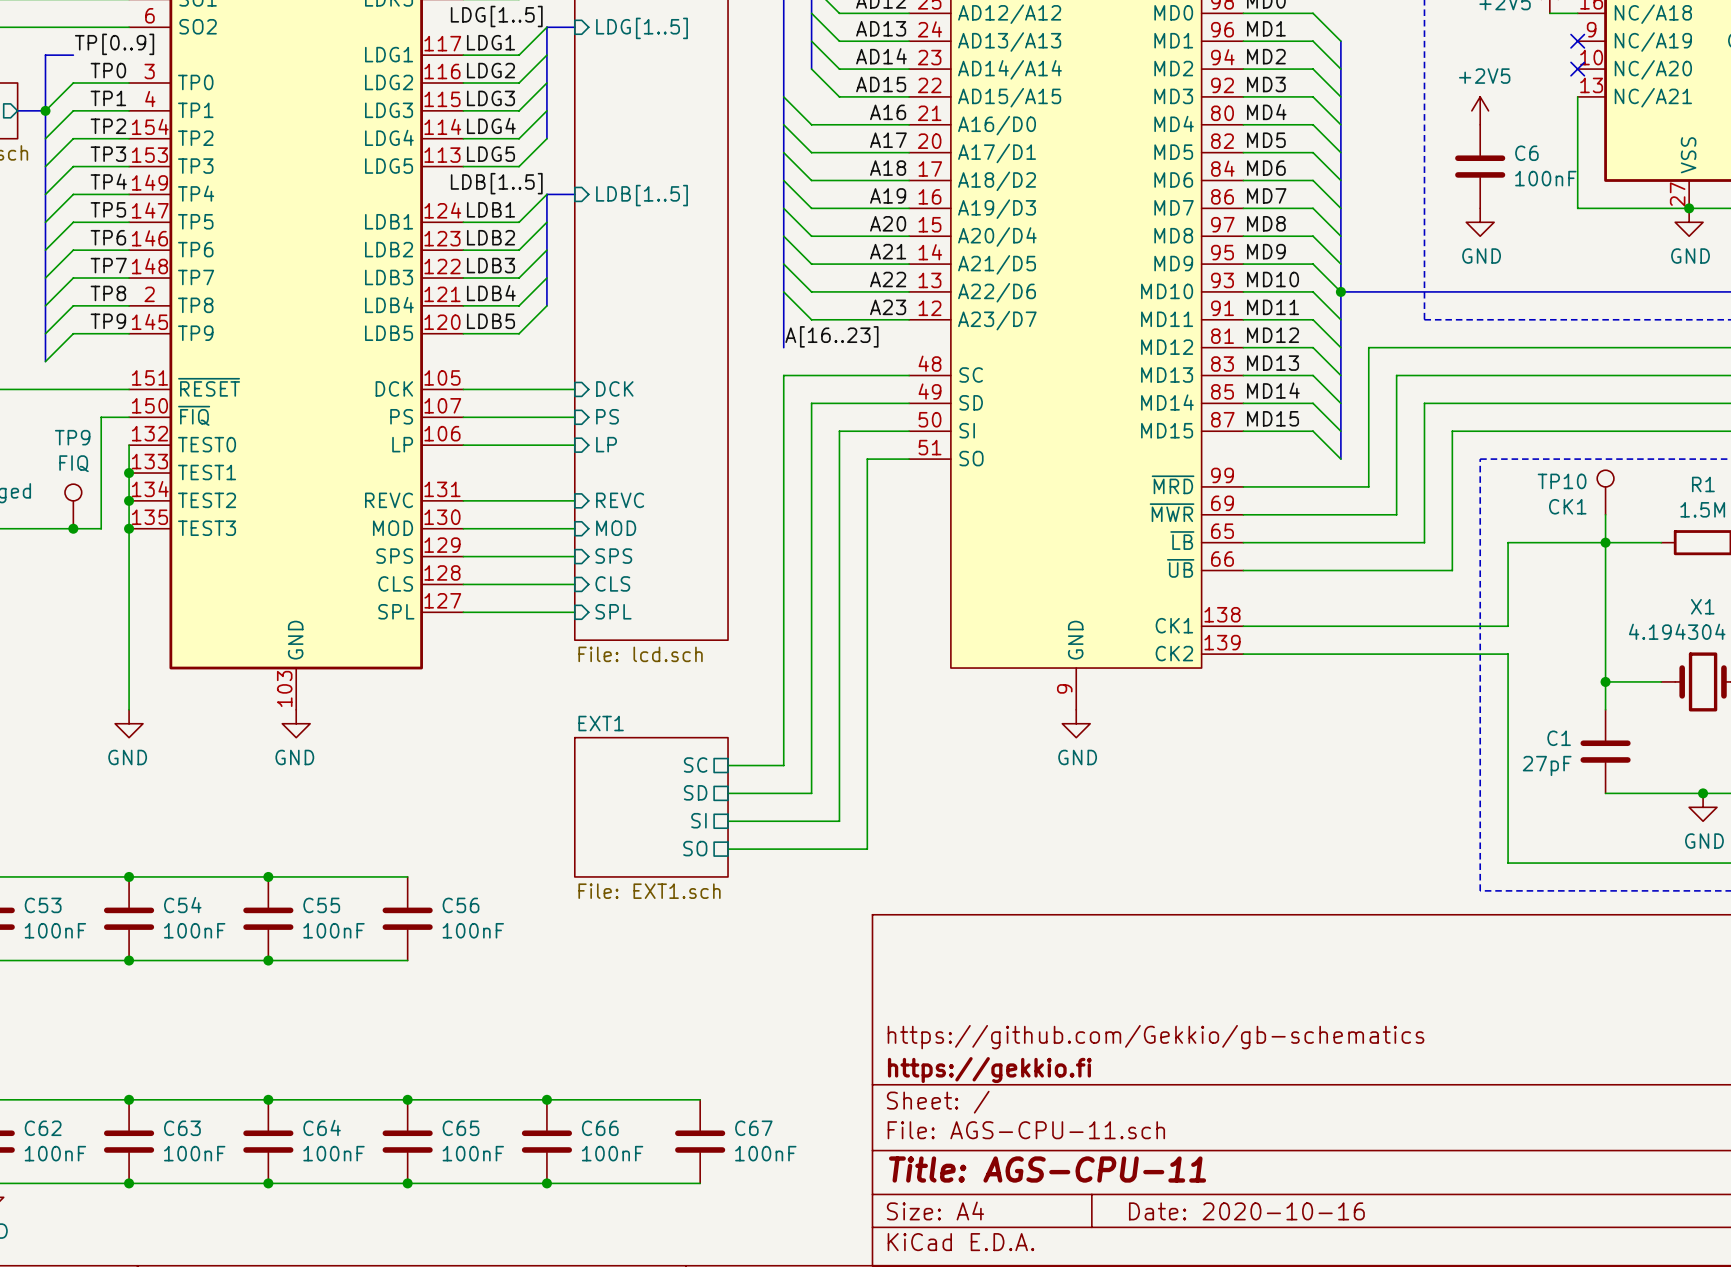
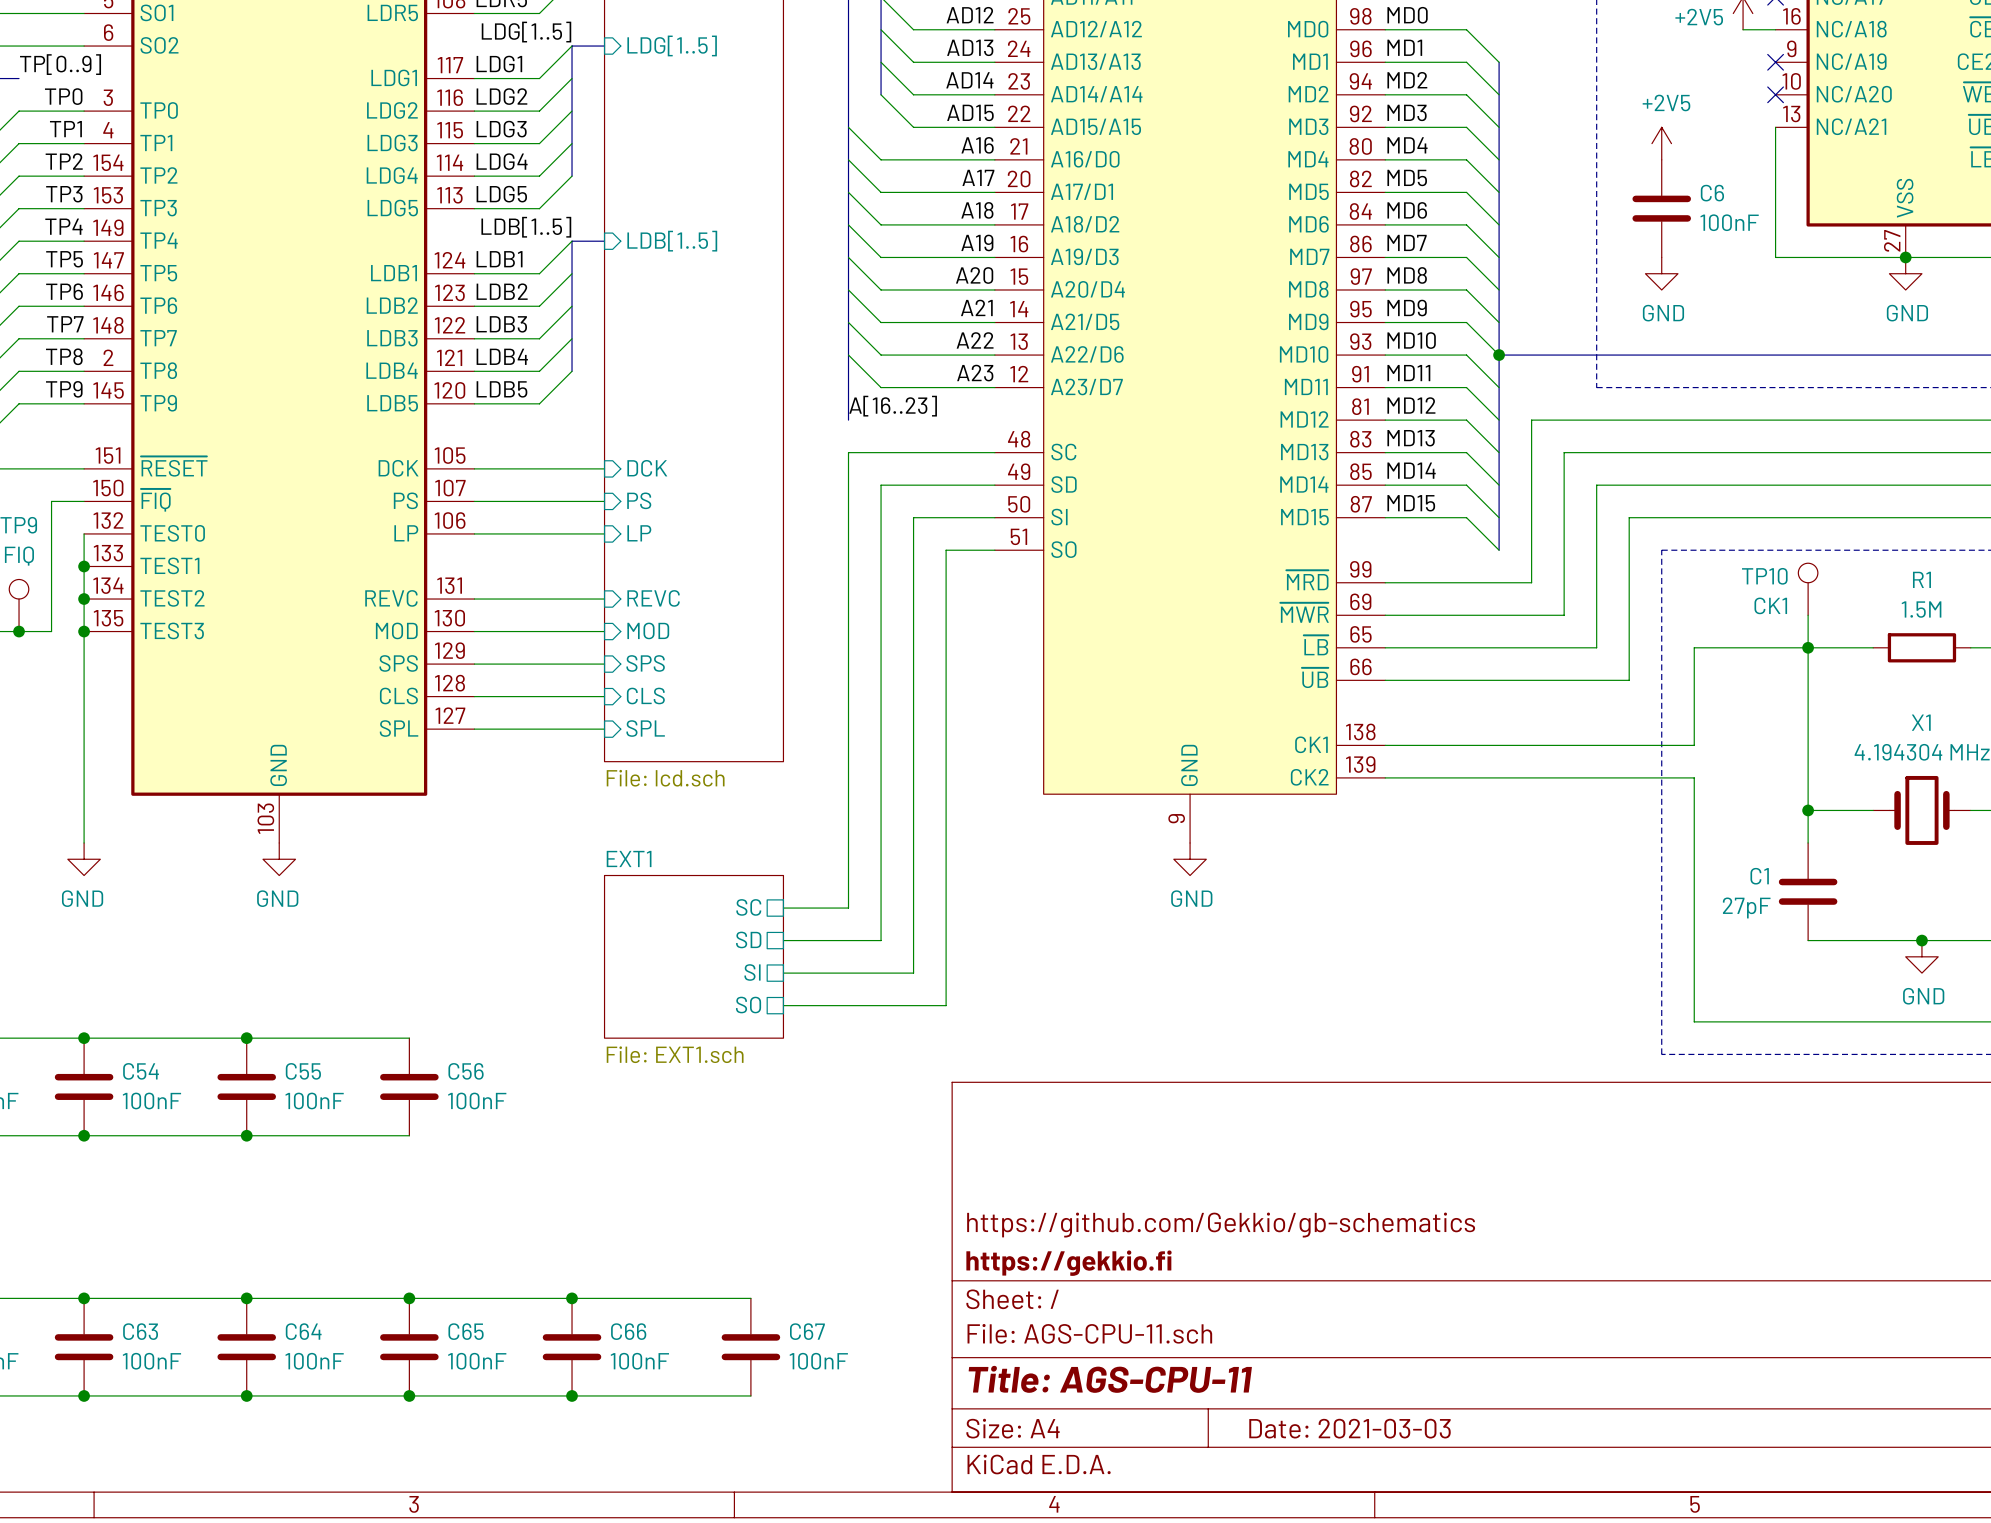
title block: Date: 2020-10-16 (1246, 1211) -> Date: 2021-03-03 (1350, 1428)

